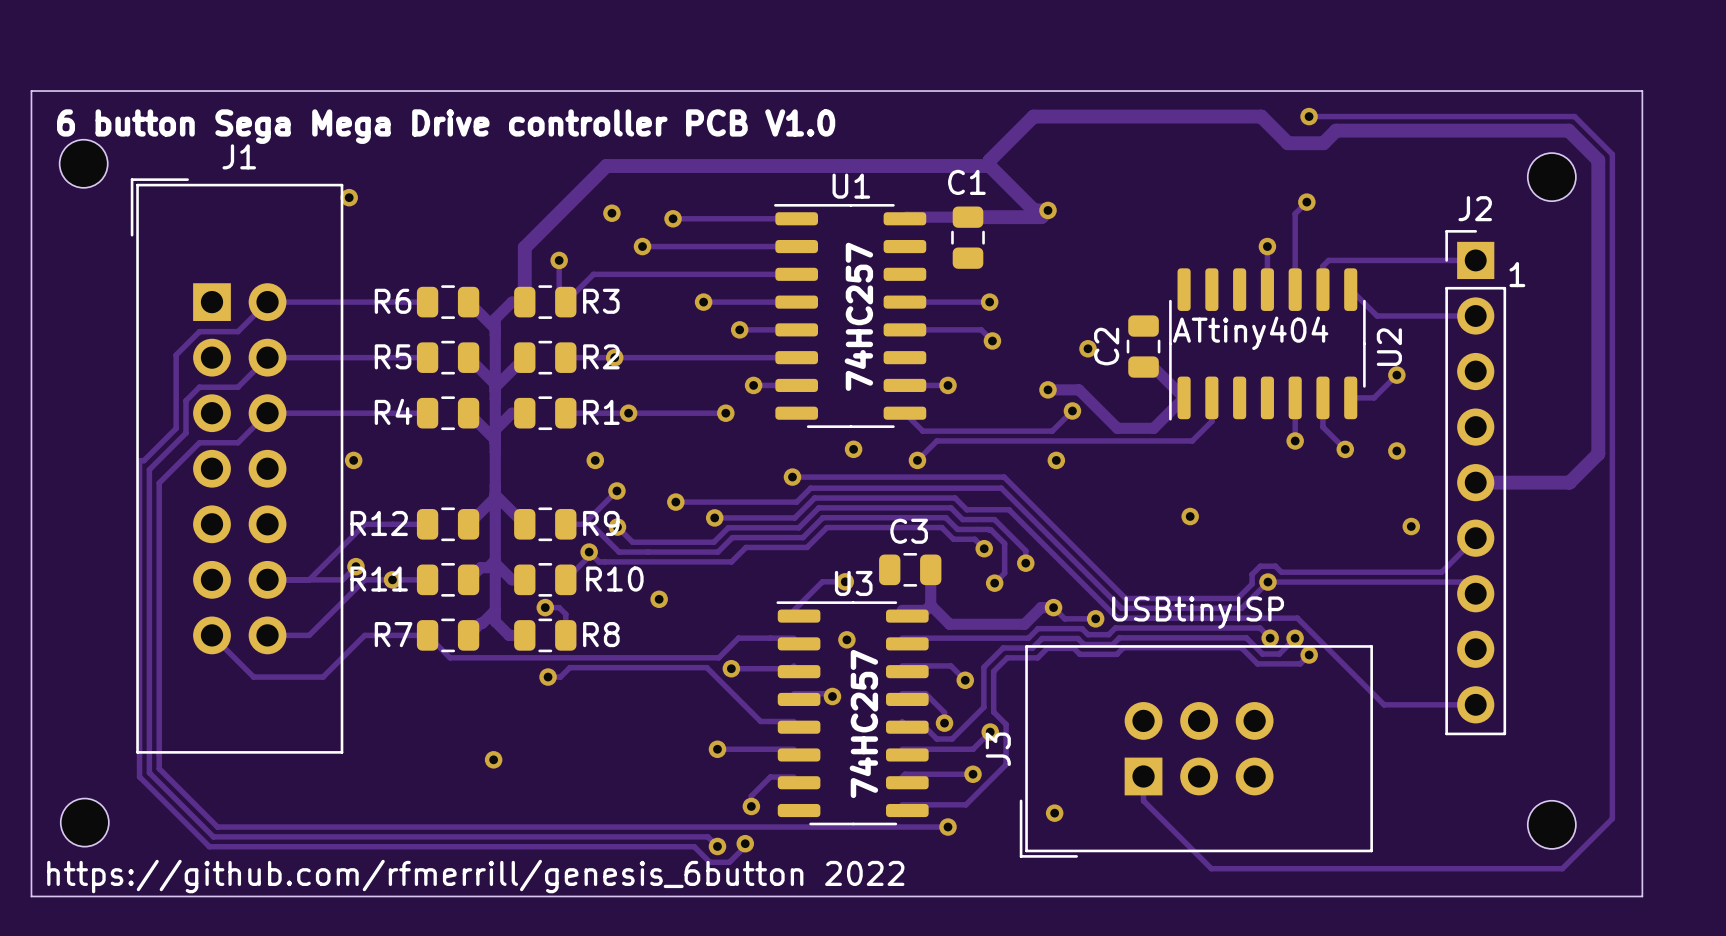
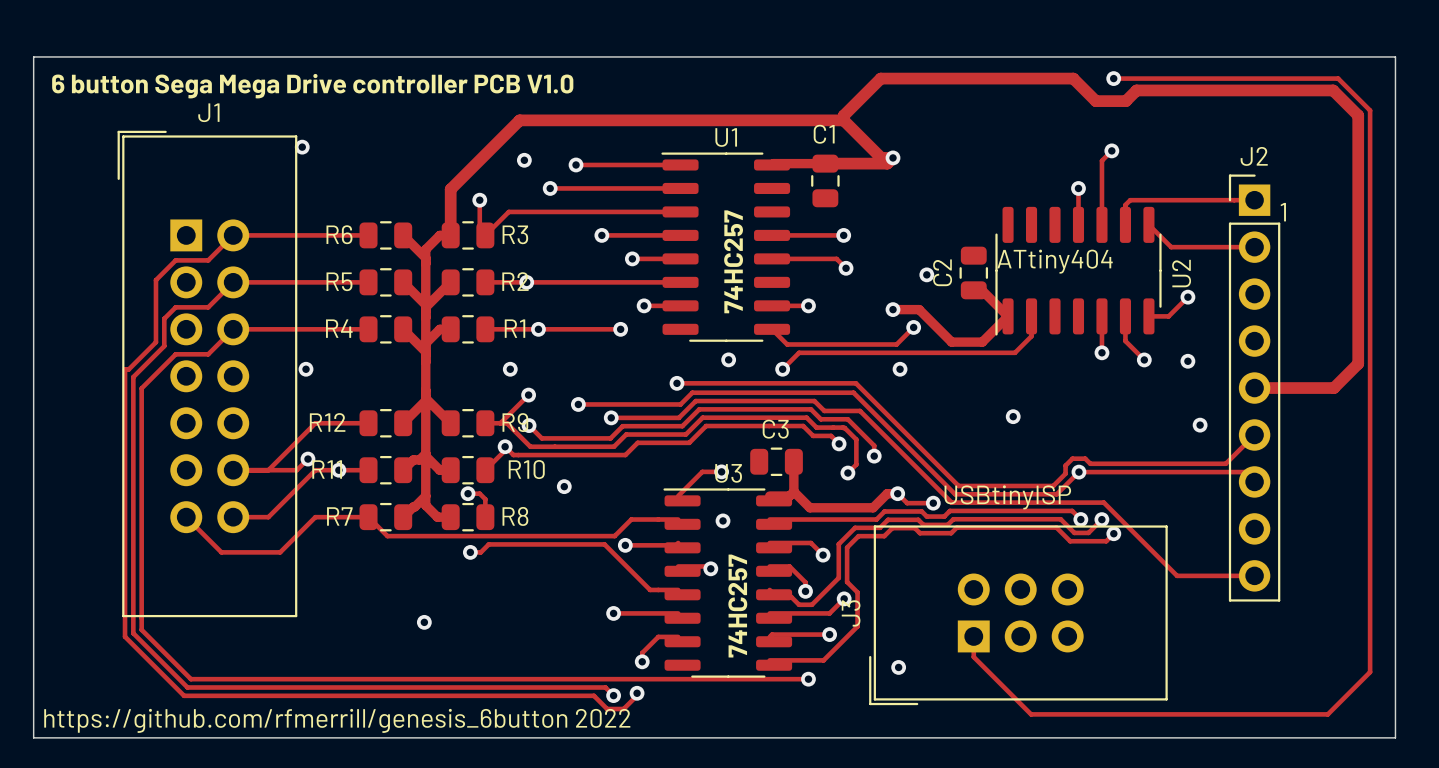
part: (83, 163) -> none
part: (1551, 177) -> none
part: (84, 822) -> none
part: (1551, 824) -> none

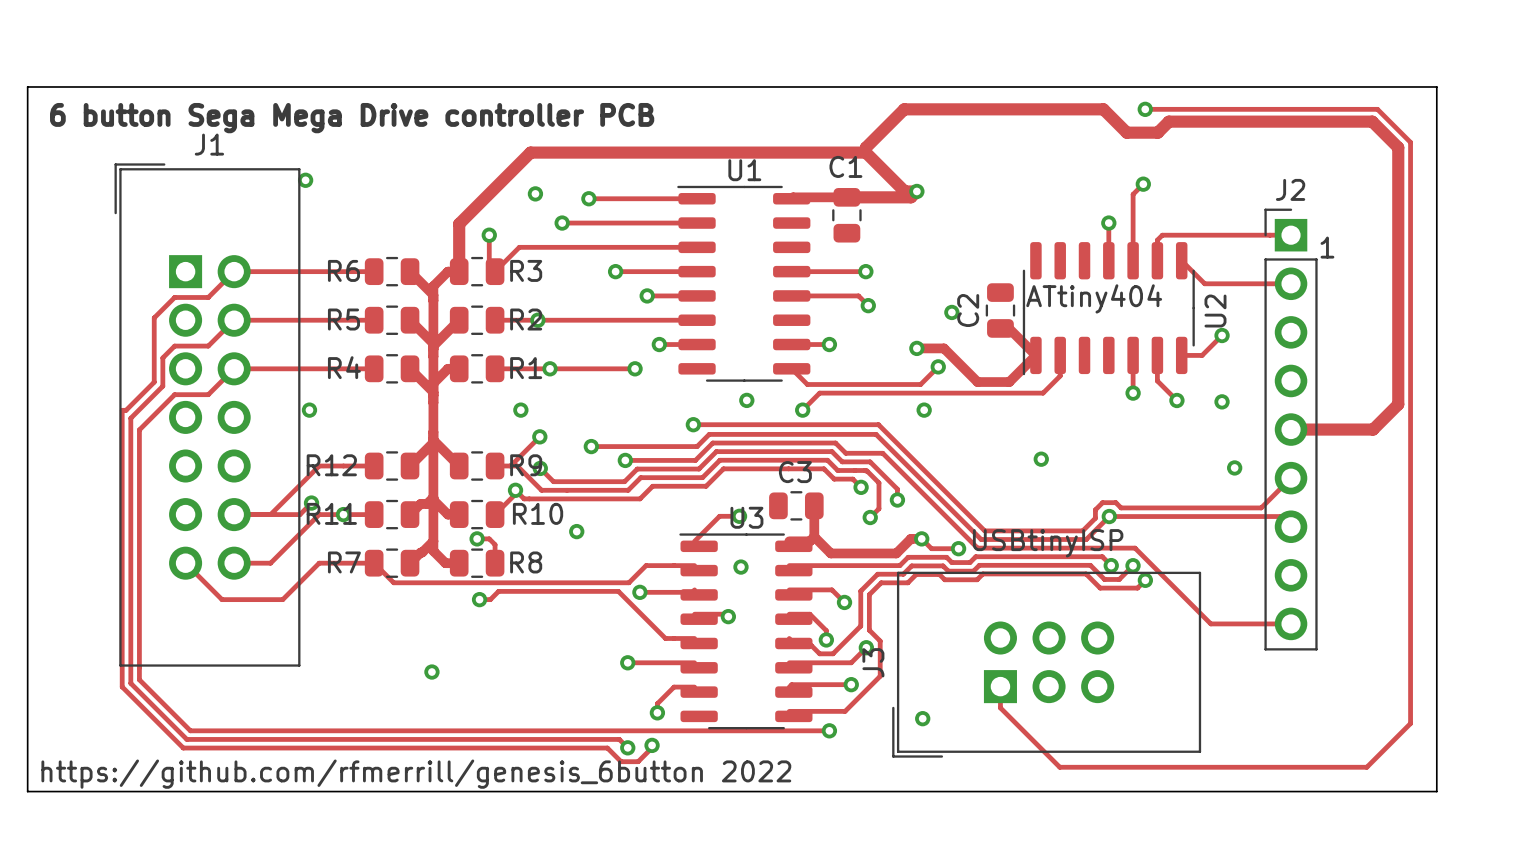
text: 6 button Sega Mega Drive controller PCB V1.0 (312, 86) -> 6 button Sega Mega Drive controller PCB (352, 118)
text: 74HC257 (733, 261) -> none
text: 74HC257 (737, 606) -> none

